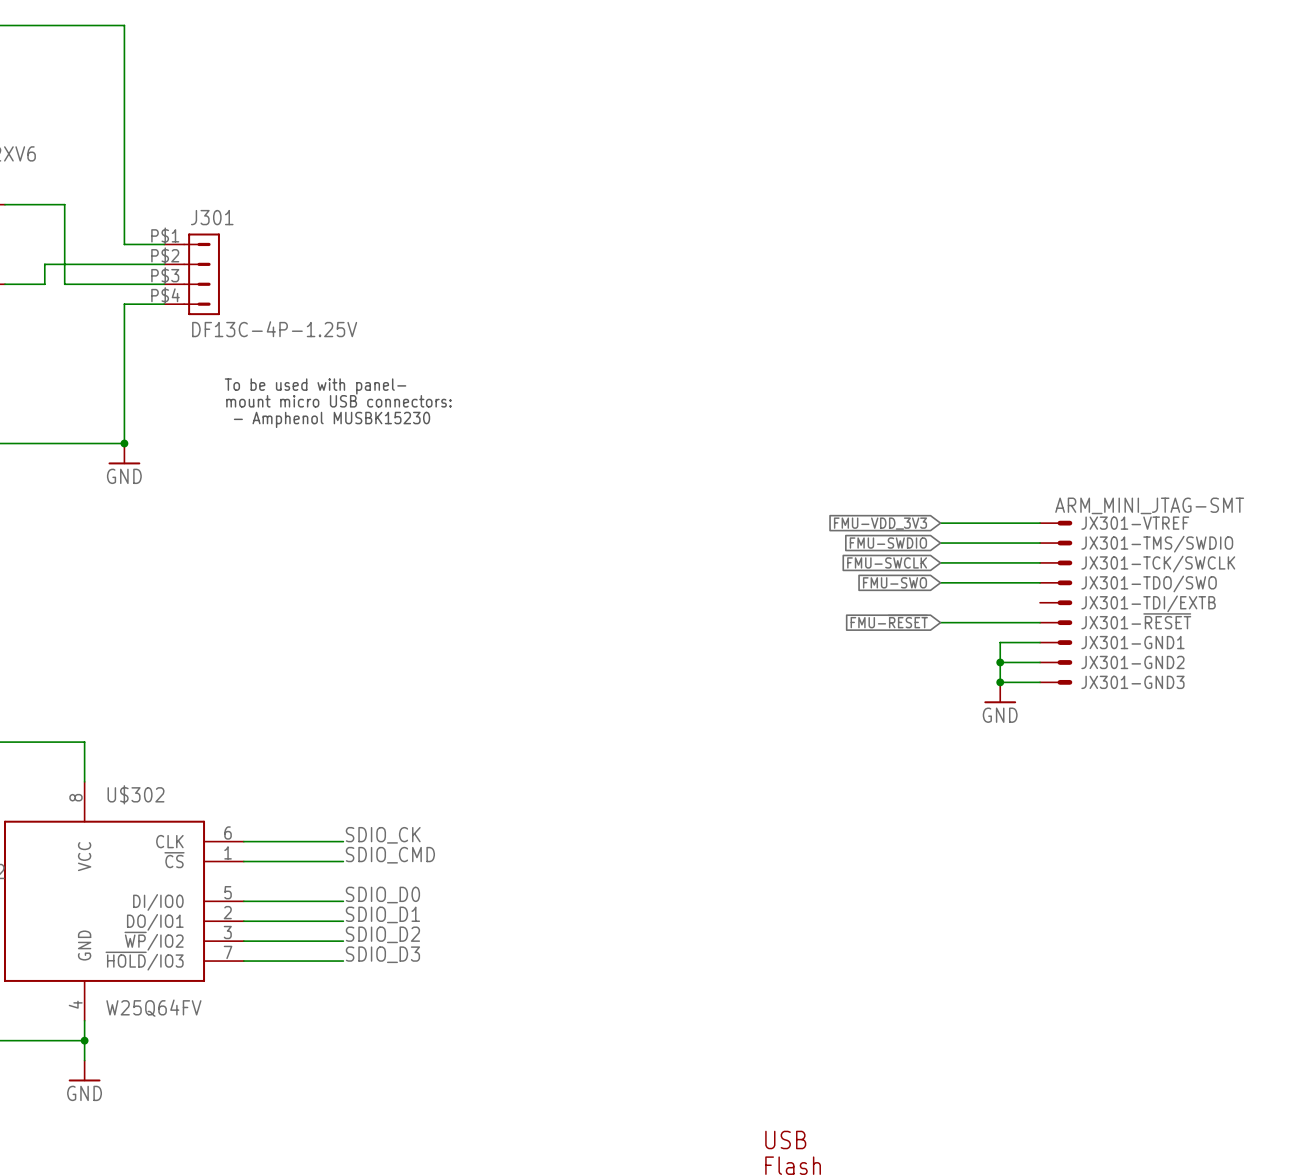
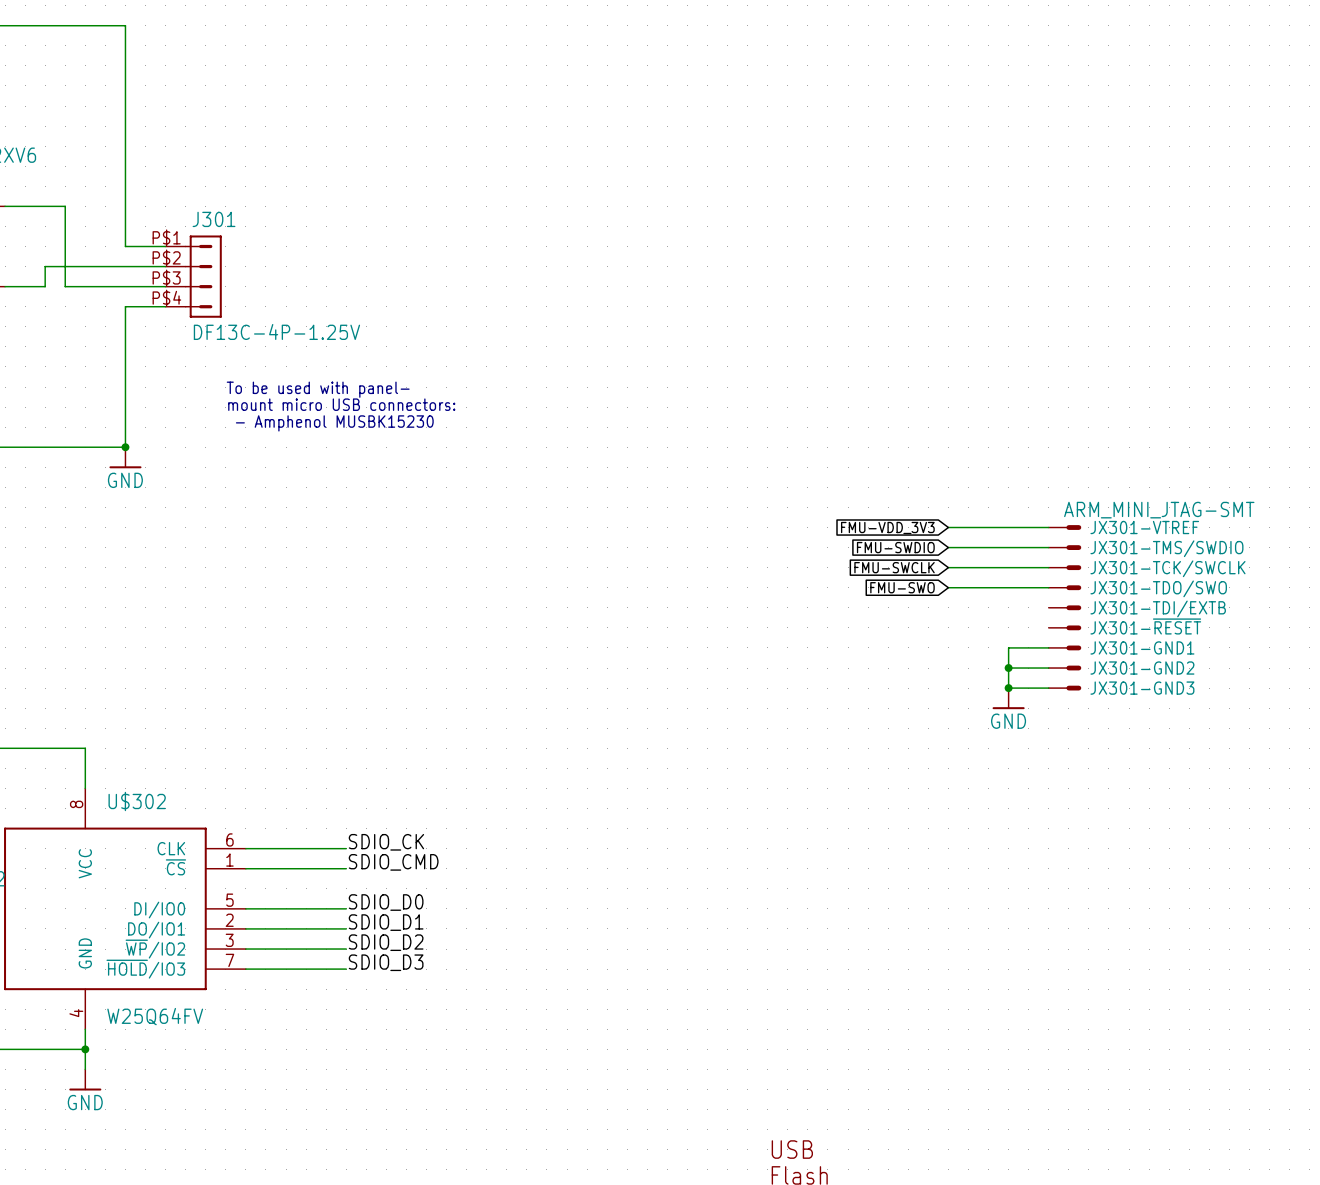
global label: FMU-~{RESET} (889, 621) -> none
wire: (940, 622) (1040, 622) -> none

